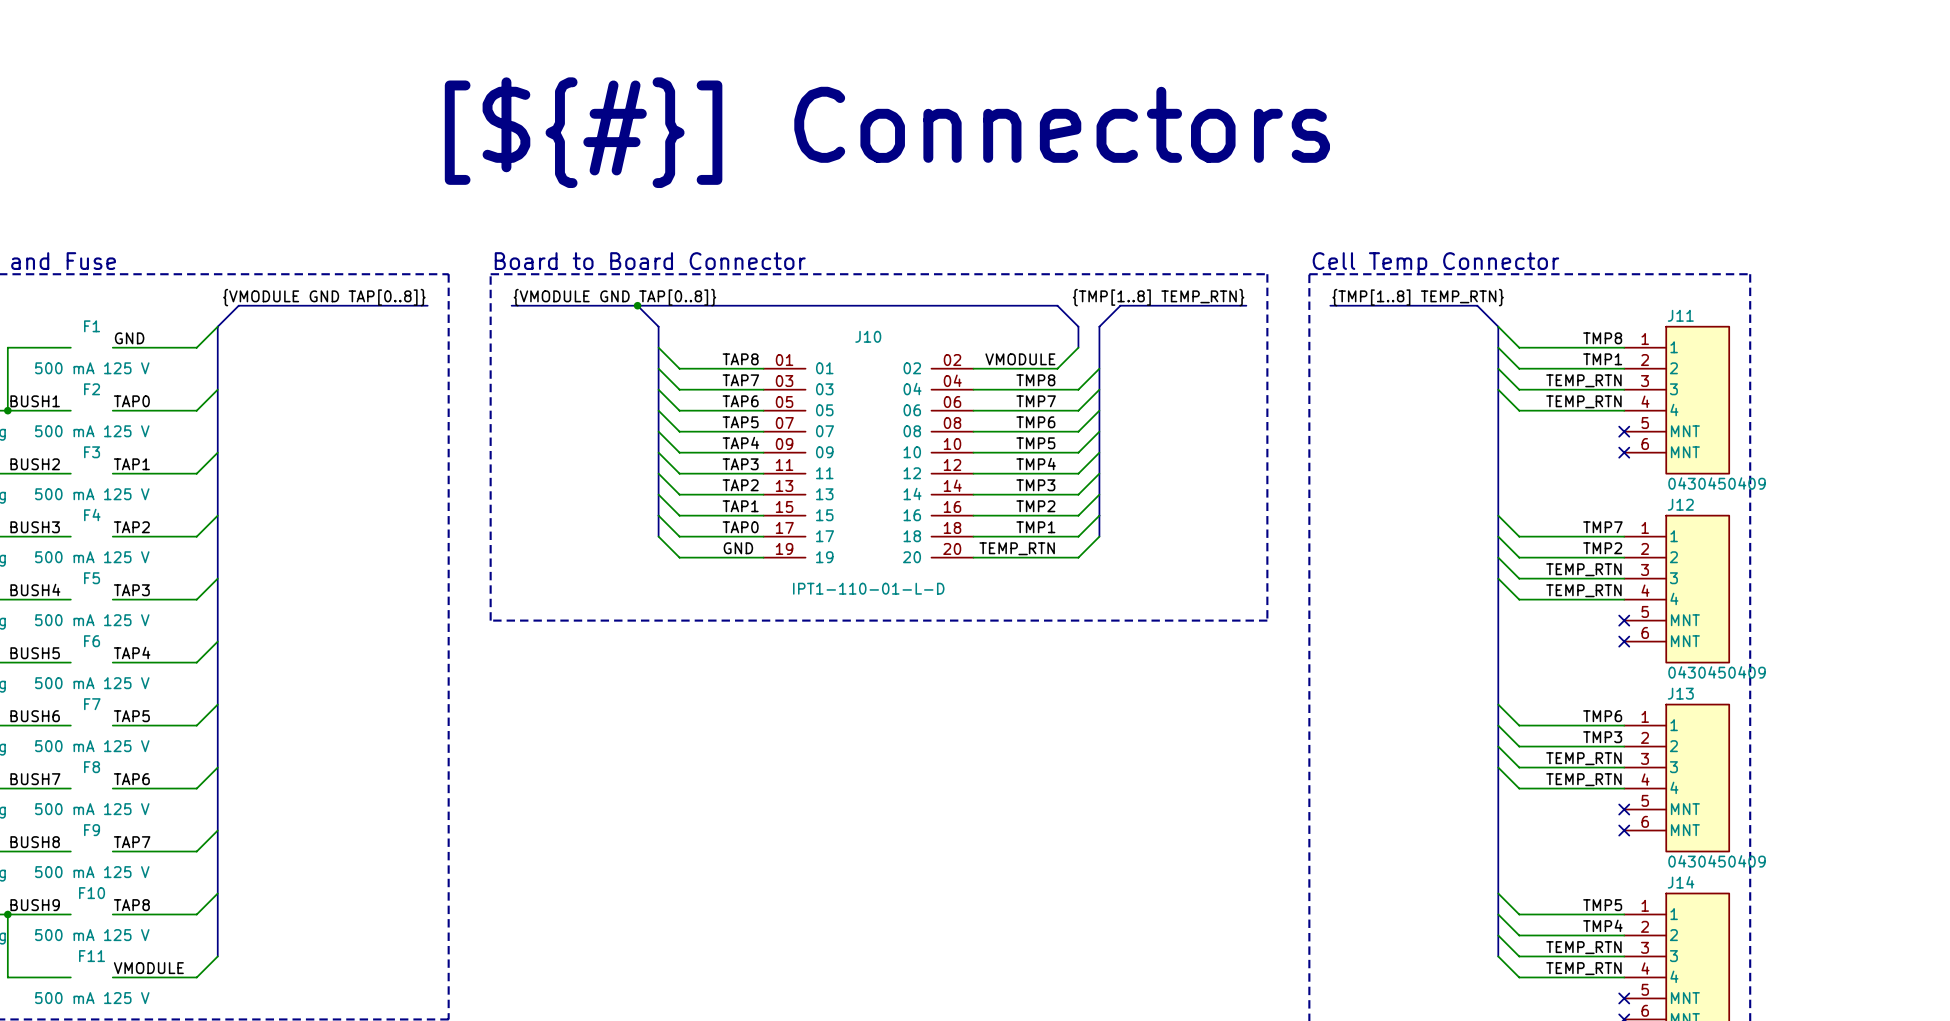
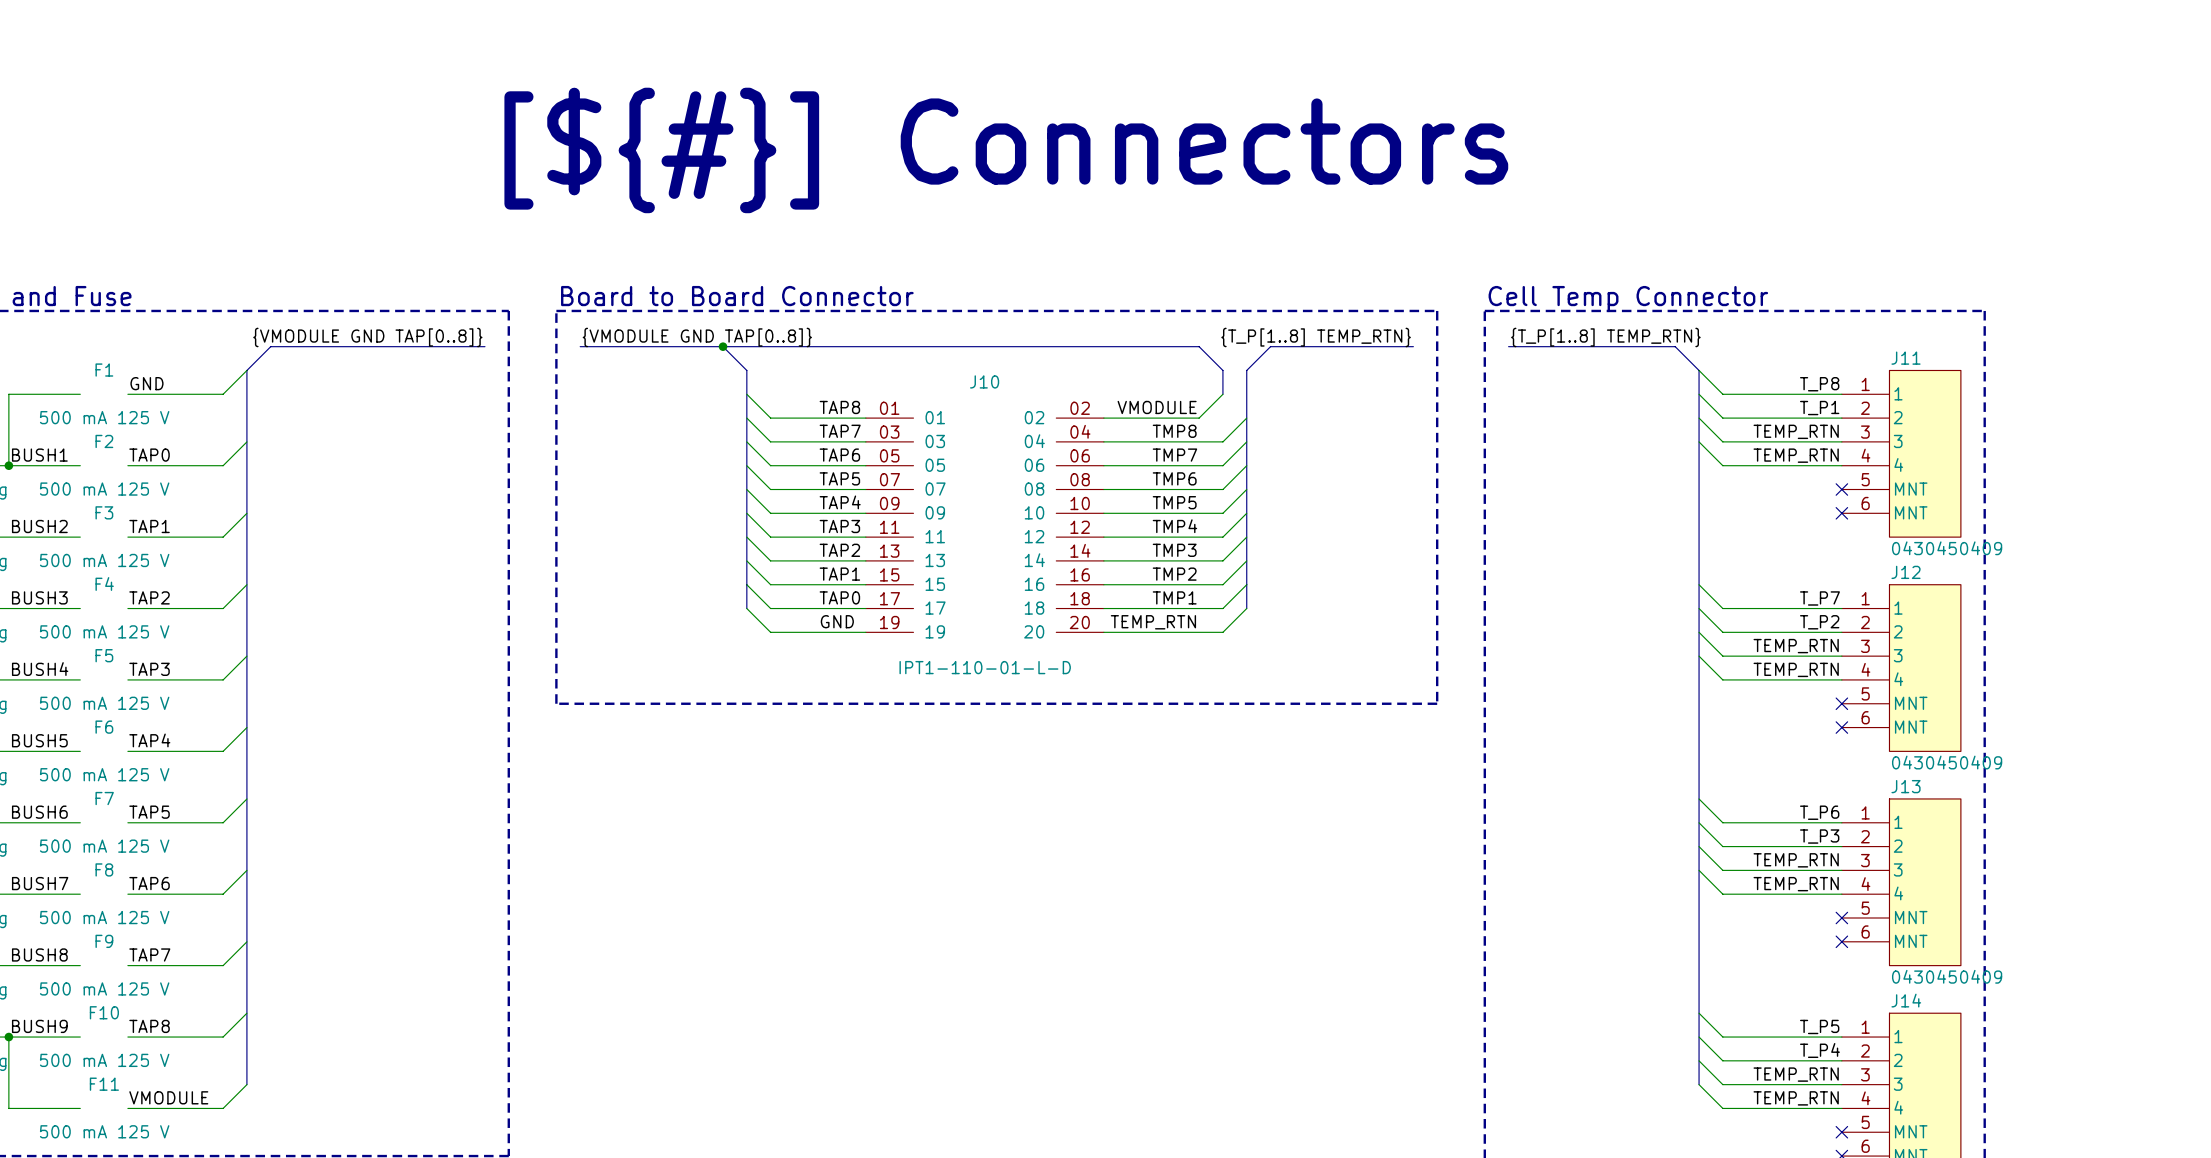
label: {TMP[1..8] TEMP_RTN} (1158, 297) -> {T_P[1..8] TEMP_RTN} (1316, 337)
label: {TMP[1..8] TEMP_RTN} (1418, 297) -> {T_P[1..8] TEMP_RTN} (1605, 337)
label: TMP8 (1602, 338) -> T_P8 (1819, 384)
label: TMP1 (1602, 359) -> T_P1 (1819, 408)
label: TMP7 (1602, 527) -> T_P7 (1819, 598)
label: TMP2 (1602, 548) -> T_P2 (1819, 622)
label: TMP6 (1602, 716) -> T_P6 (1819, 812)
label: TMP3 (1602, 737) -> T_P3 (1819, 836)
label: TMP5 (1602, 905) -> T_P5 (1819, 1026)
label: TMP4 (1602, 925) -> T_P4 (1819, 1050)

